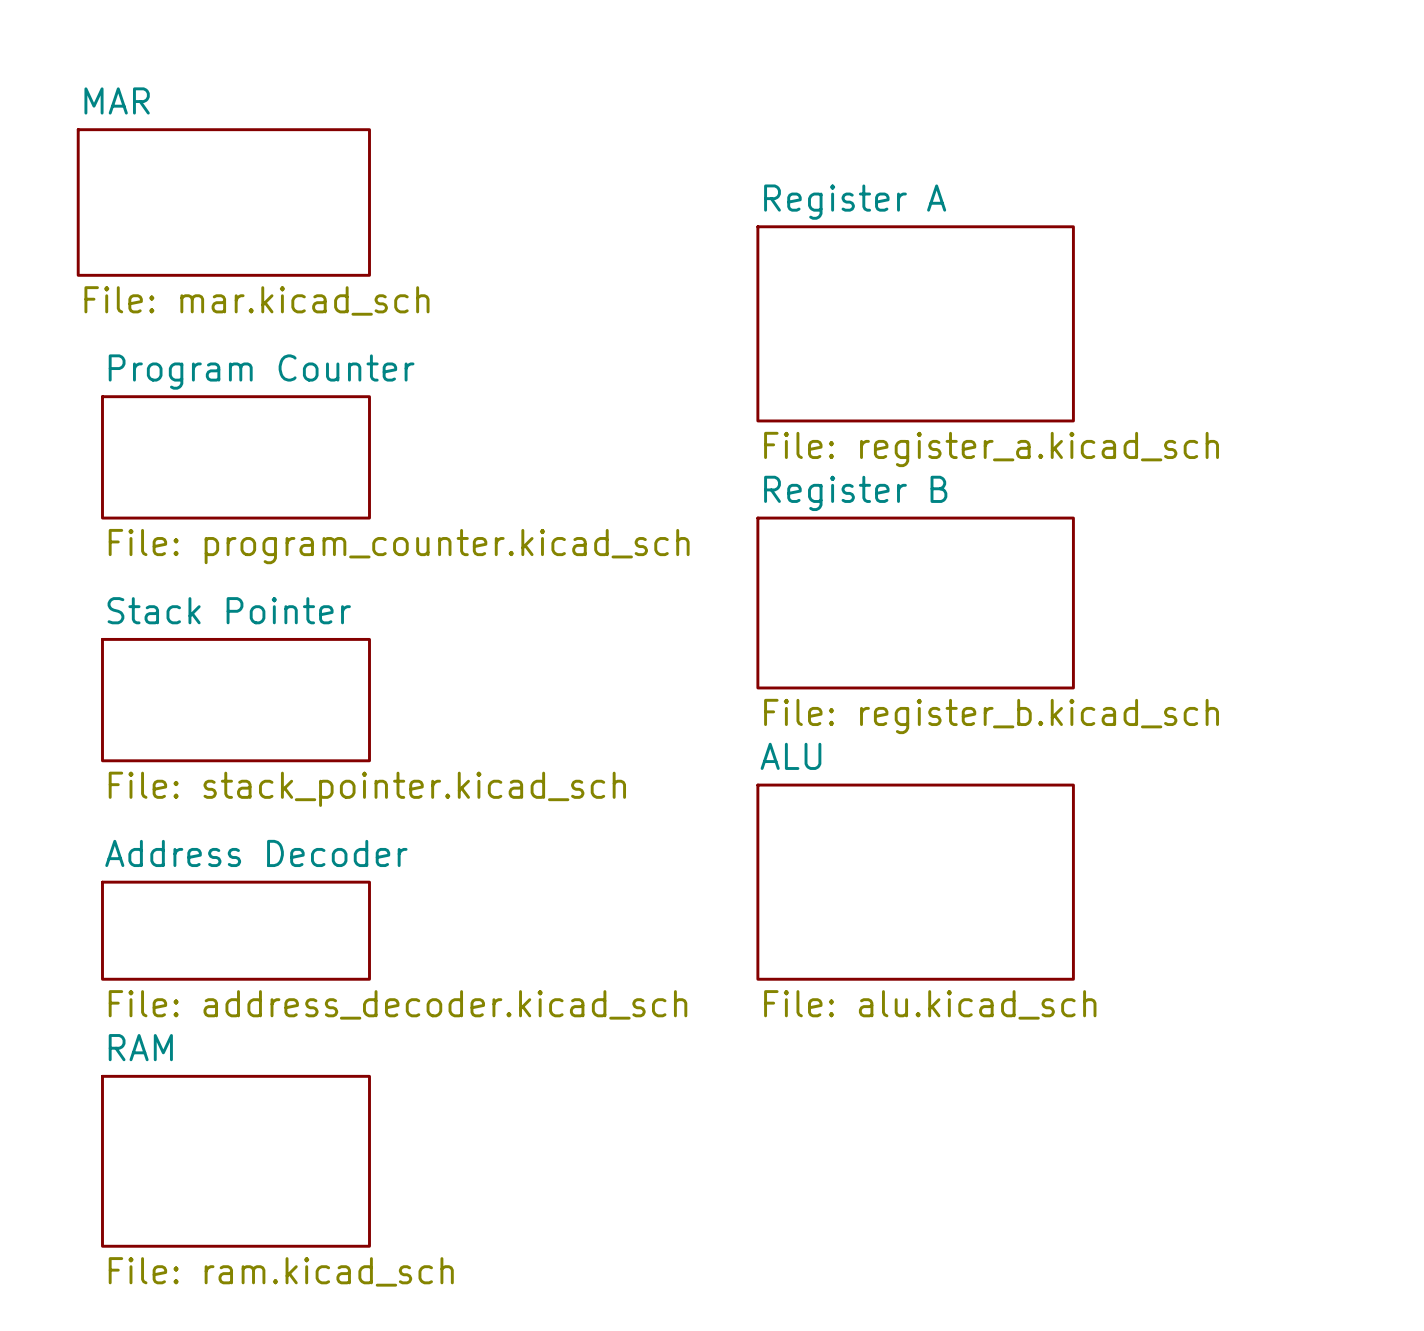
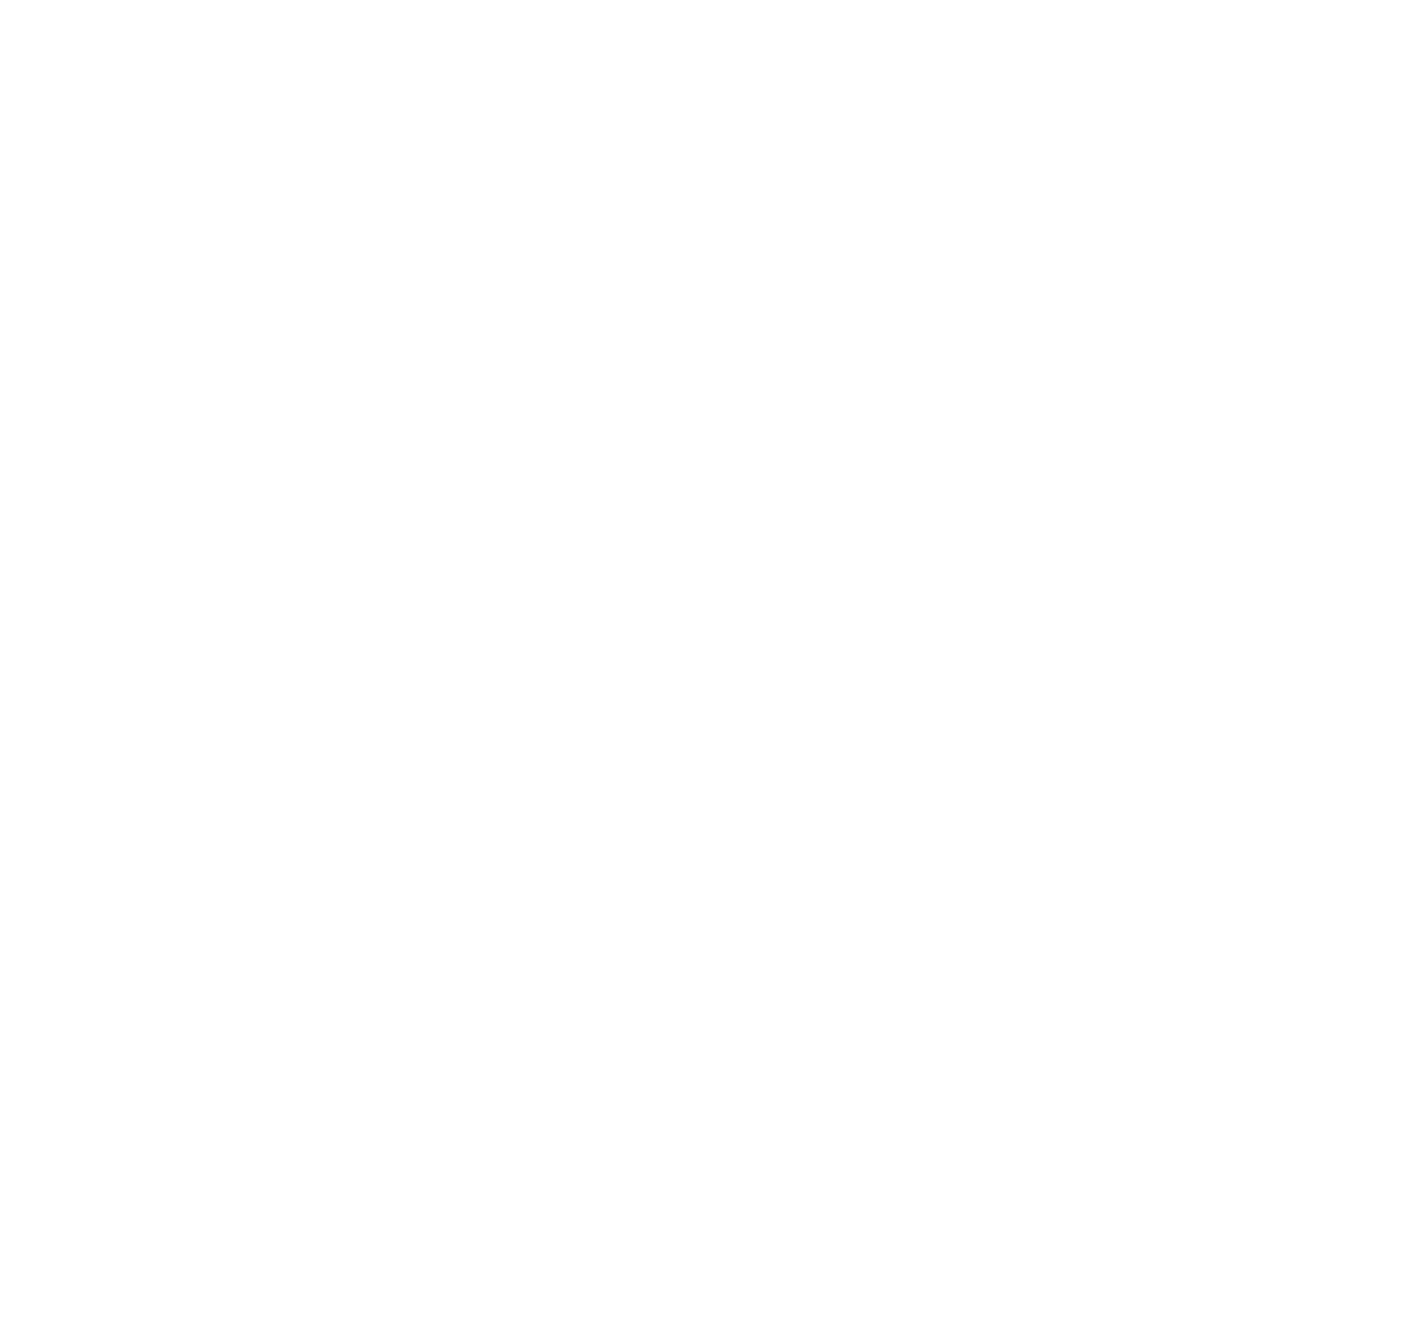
sheet MAR: File: mar.kicad_sch (223, 202) -> none
sheet Register A: File: register_a.kicad_sch (915, 323) -> none
sheet Program Counter: File: program_counter.kicad_sch (235, 457) -> none
sheet Register B: File: register_b.kicad_sch (915, 603) -> none
sheet Stack Pointer: File: stack_pointer.kicad_sch (235, 700) -> none
sheet ALU: File: alu.kicad_sch (915, 882) -> none
sheet Address Decoder: File: address_decoder.kicad_sch (235, 930) -> none
sheet RAM: File: ram.kicad_sch (235, 1161) -> none

